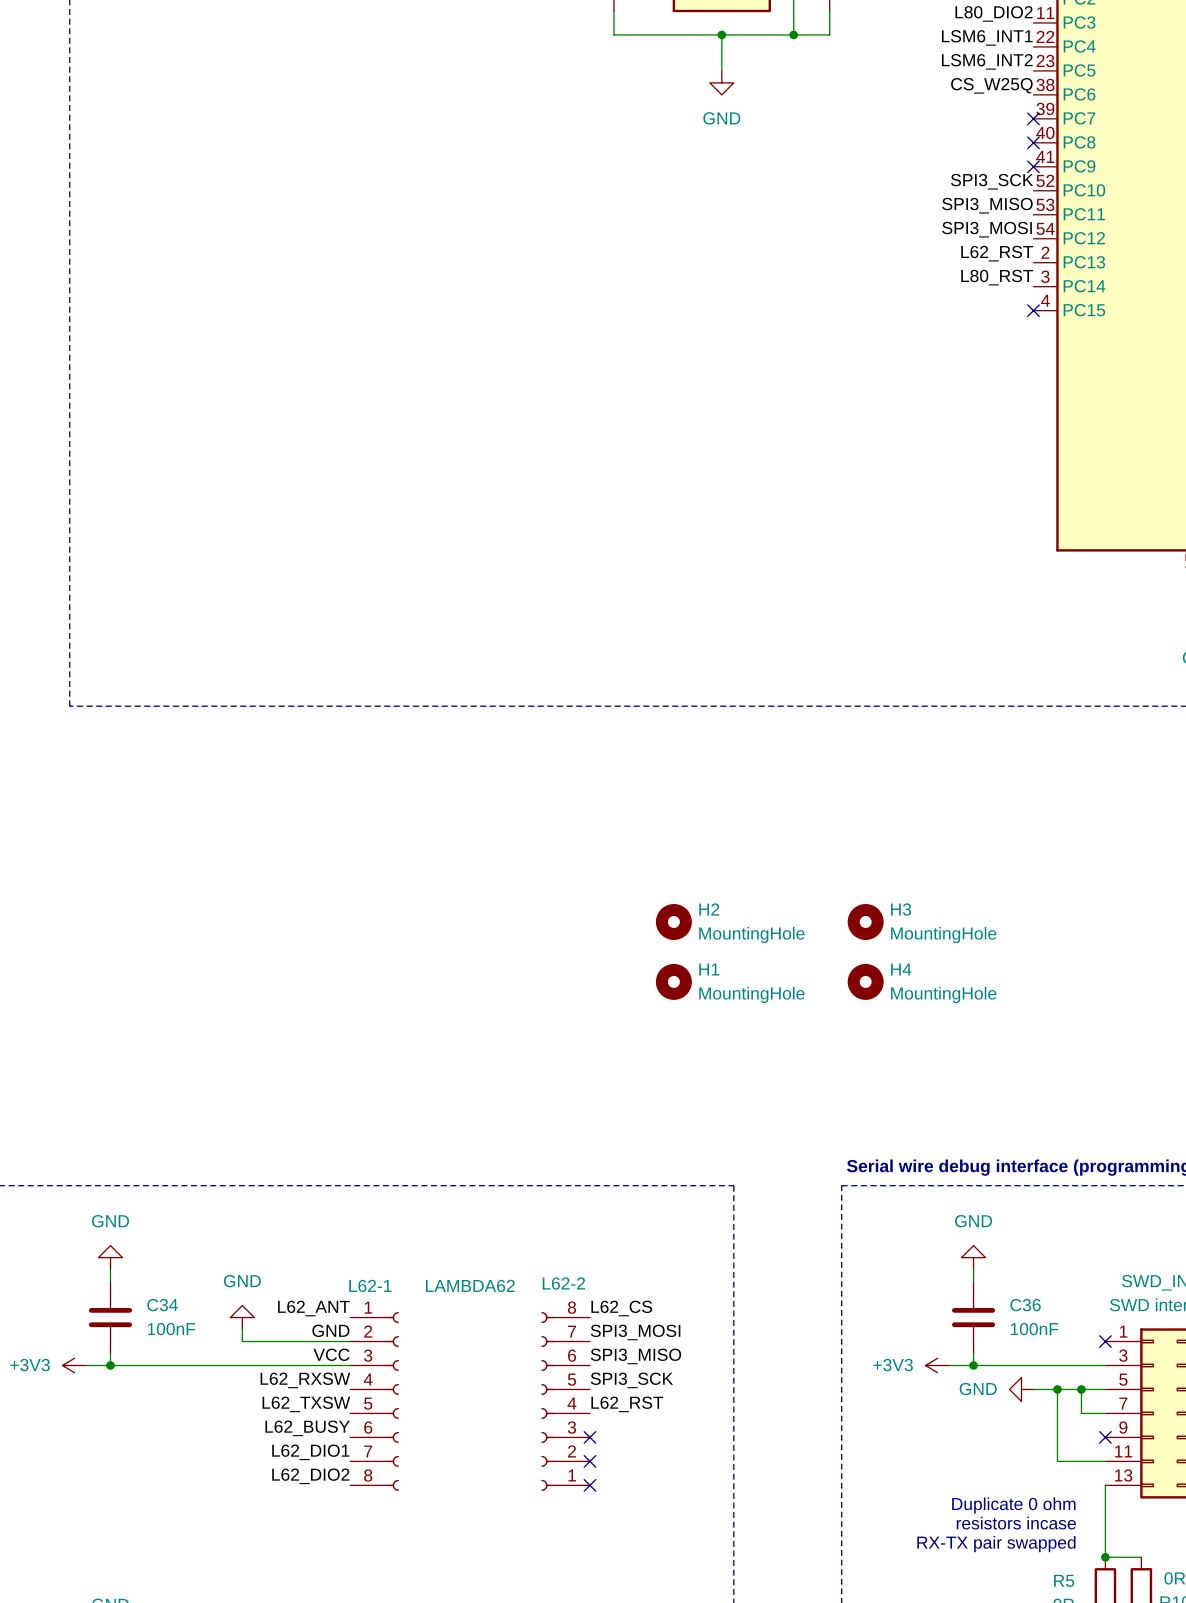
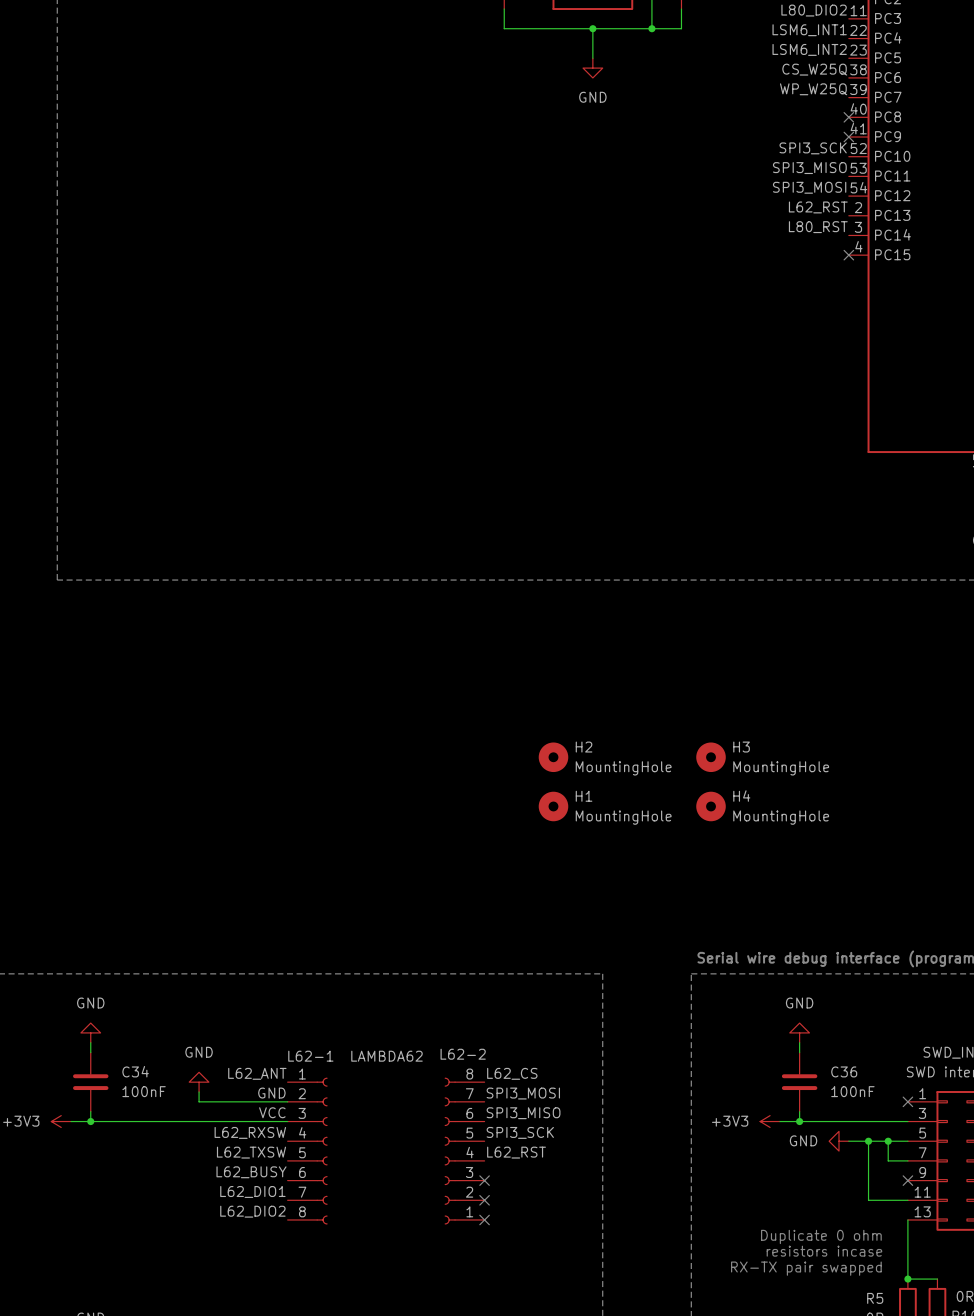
label: none -> WP_W25Q (813, 89)
no-connect mark: (1033, 118) -> none

